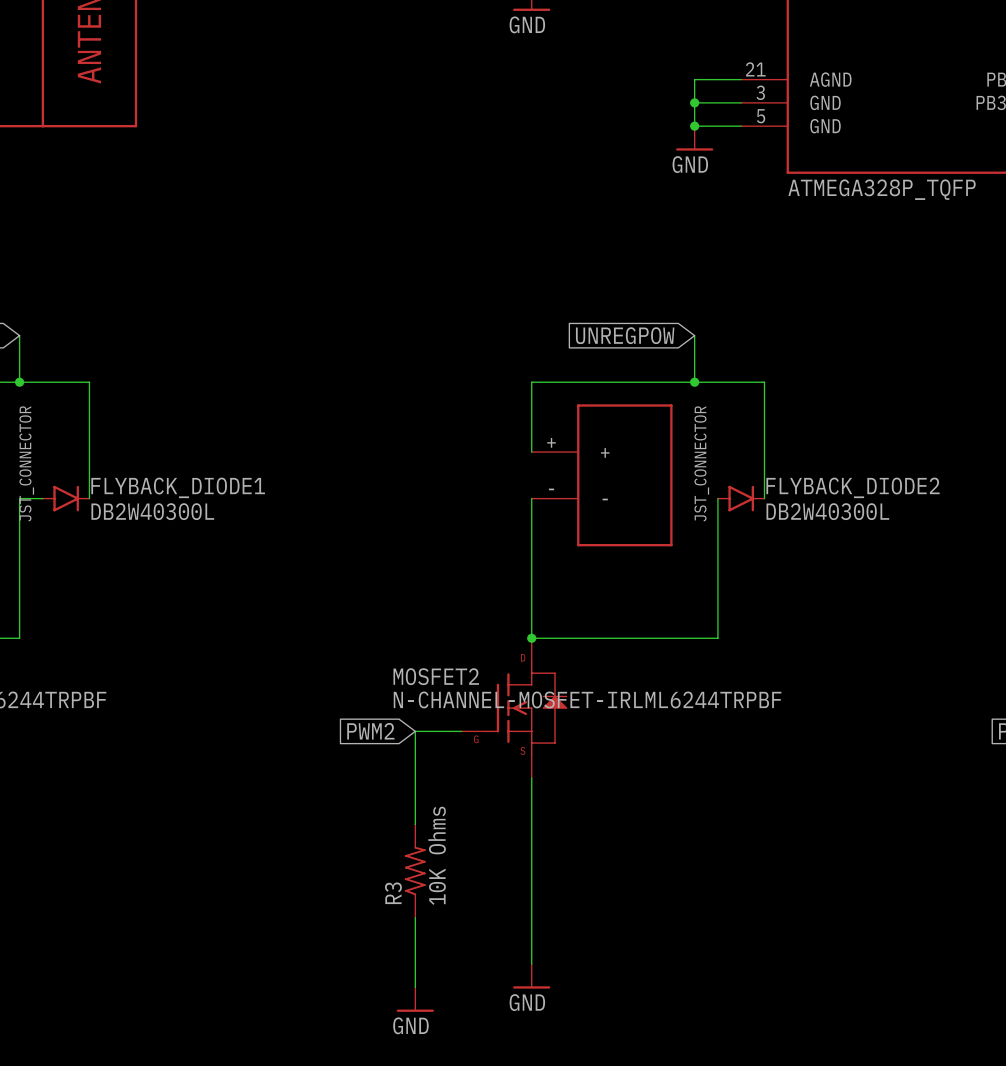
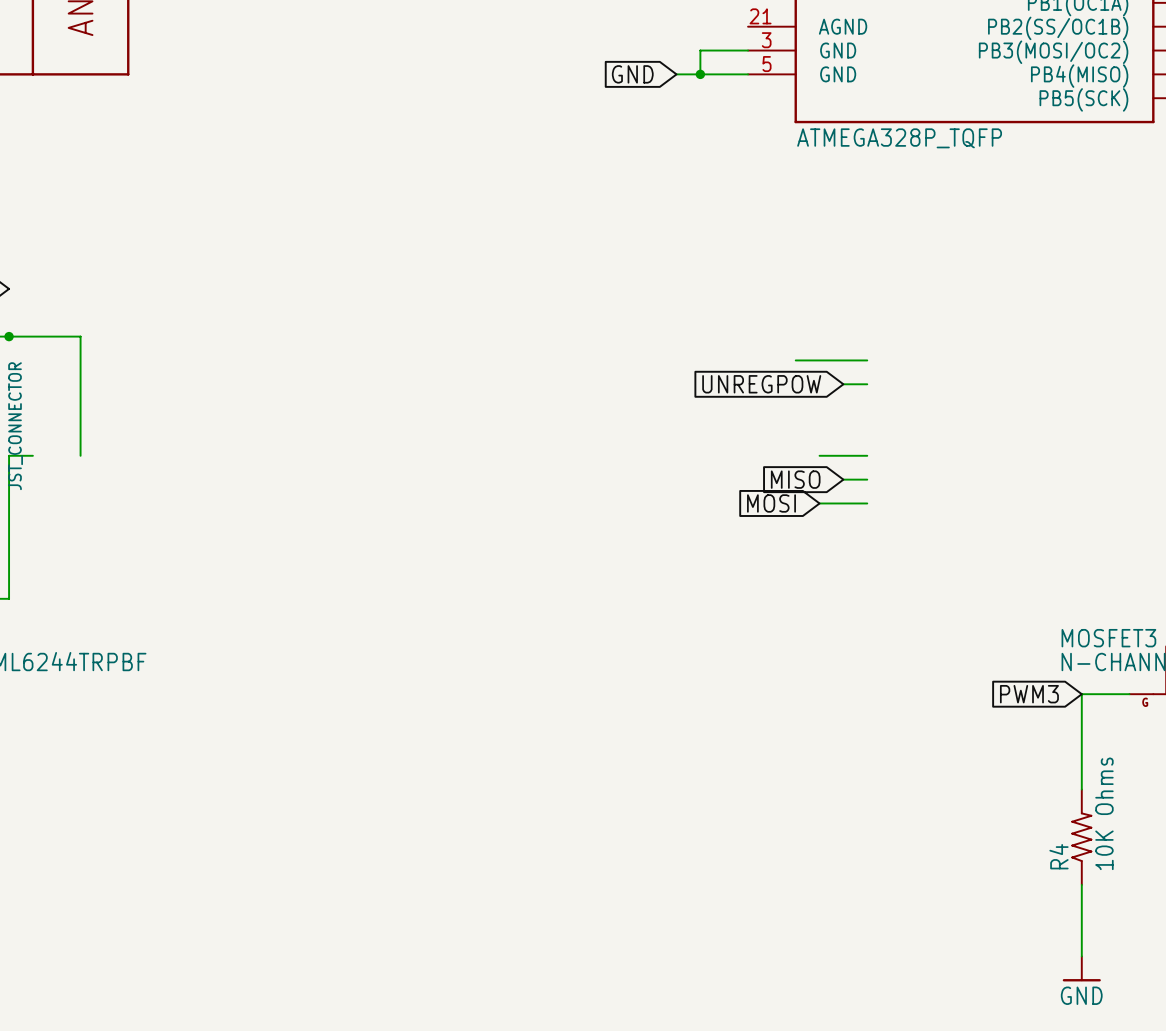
wire: (741, 79) (694, 79) (694, 102) -> none
junction: (694, 102) -> none
global label: none -> GND (632, 74)
wire: none -> (676, 74) (700, 74)
power symbol: GND (694, 138) -> none
wire: (19, 335) (19, 382) -> none
global label position: UNREGPOW (625, 335) -> UNREGPOW (761, 384)
wire: (694, 335) (694, 382) -> none
junction: (694, 382) -> none
wire: none -> (795, 360) (867, 360)
wire: none -> (843, 384) (867, 384)
wire: (531, 452) (531, 382) (764, 382) (764, 498) -> none
part: (602, 475) -> none
FLYBACK_DIODE1: DB2W40300L (66, 498) -> none
wire: (531, 498) (531, 638) (717, 638) (717, 498) -> none
FLYBACK_DIODE2: DB2W40300L (741, 498) -> none
wire: none -> (819, 455) (867, 455)
global label: none -> MISO (795, 479)
wire: none -> (843, 479) (867, 479)
global label: none -> MOSI (771, 503)
wire: none -> (819, 503) (867, 503)
junction: (531, 638) -> none
MOSFET2: N-CHANNEL-MOSFET-IRLML6244TRPBF (514, 708) -> none
global label: PWM2 (370, 731) -> none
wire: (461, 731) (415, 731) (415, 824) -> none
wire: (531, 777) (531, 964) -> none
R3: 10K Ohms (415, 871) -> none
wire: (415, 917) (415, 987) -> none
power symbol: GND (531, 976) -> none
power symbol: GND (415, 999) -> none

